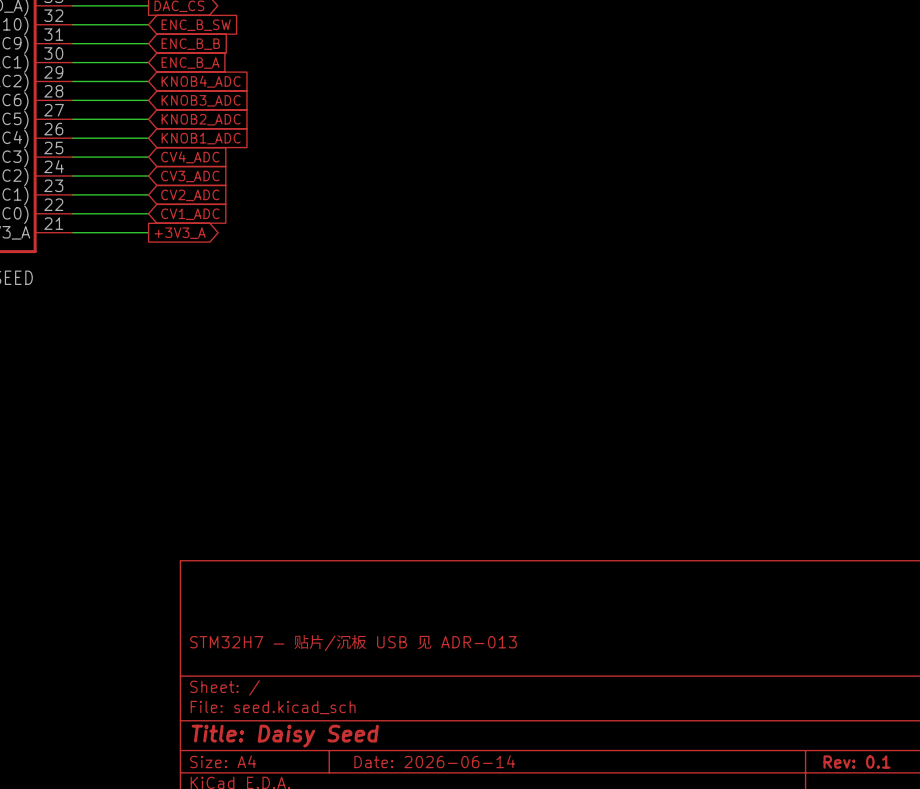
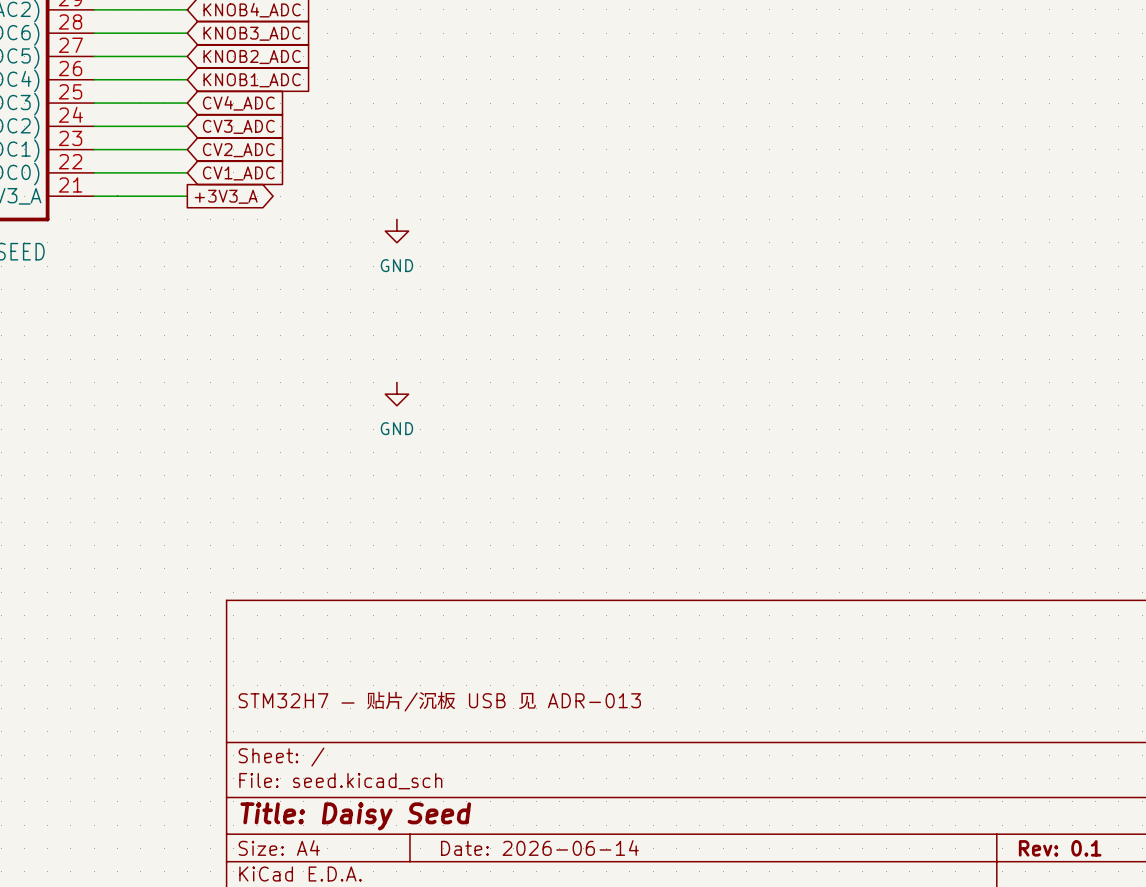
power symbol: none -> GND (396, 231)
power symbol: none -> GND (396, 394)

